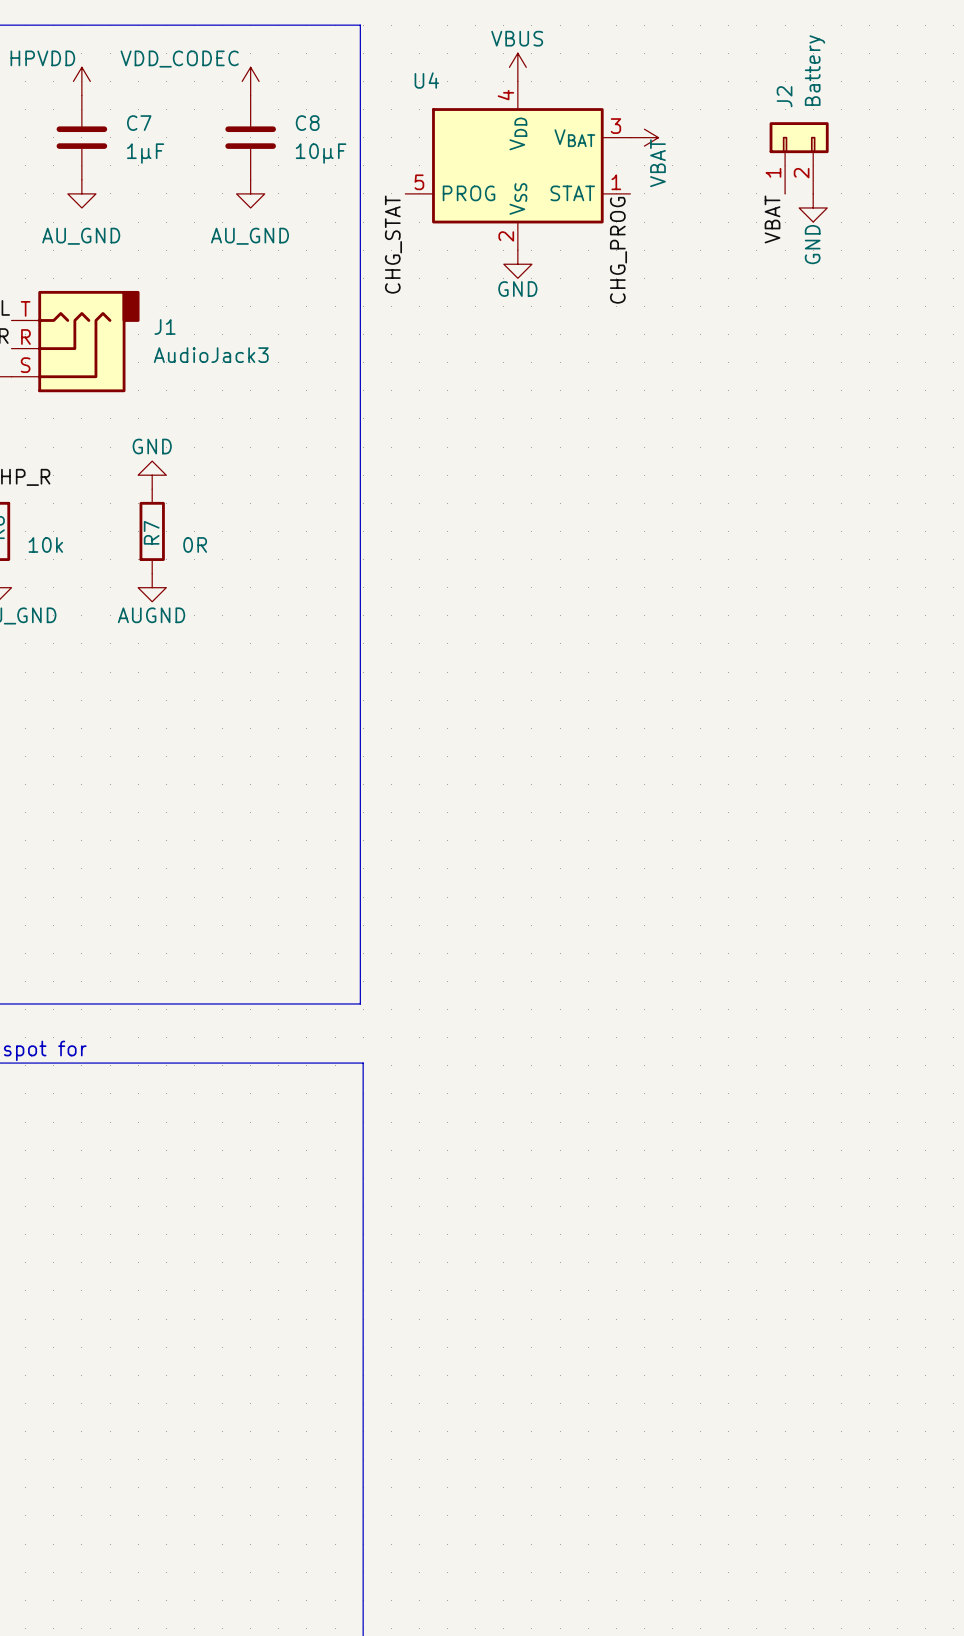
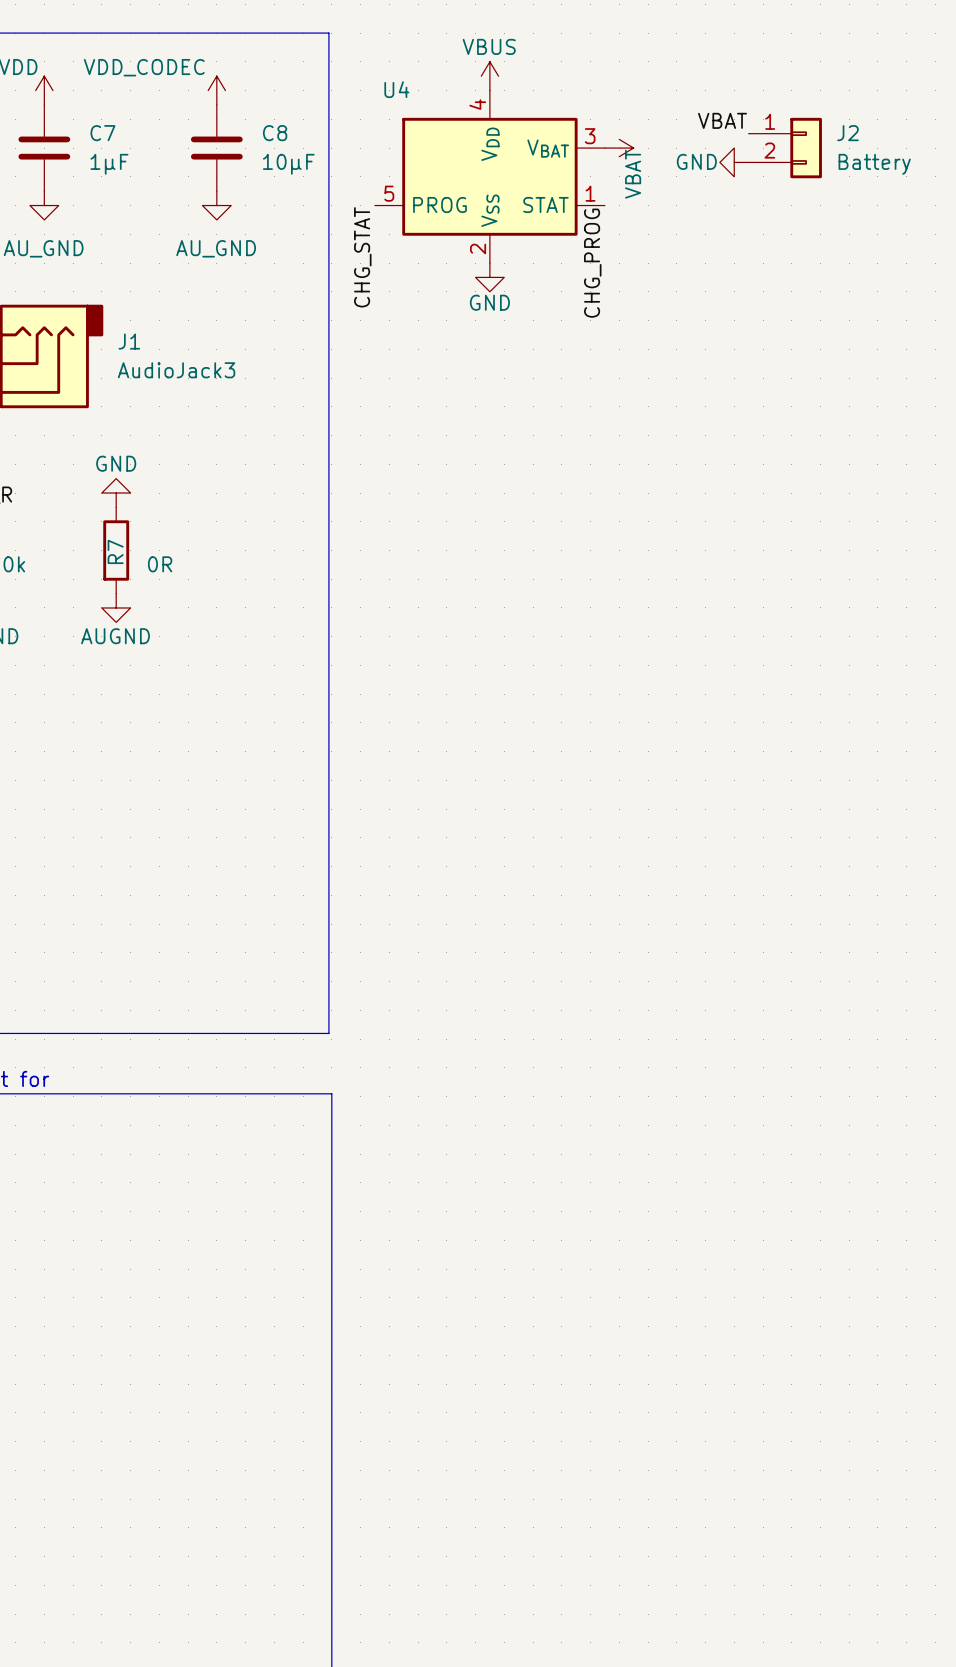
J2 rotation: 0° (799, 137) -> 90° clockwise (806, 148)
power symbol rotation: 0° (813, 207) -> 90° clockwise (734, 162)
power symbol position: GND (813, 207) -> GND (734, 162)
label rotation: 0° (772, 219) -> 90° clockwise (722, 120)
label position: VBAT (772, 219) -> VBAT (722, 120)

